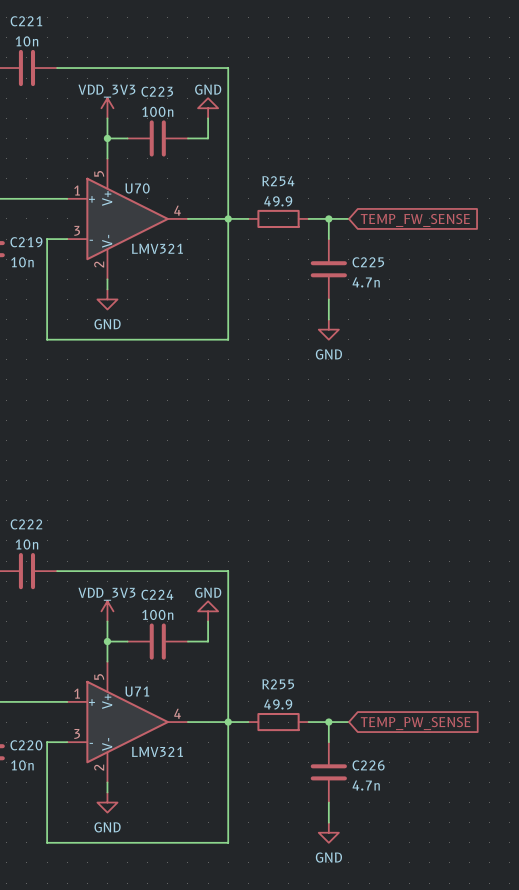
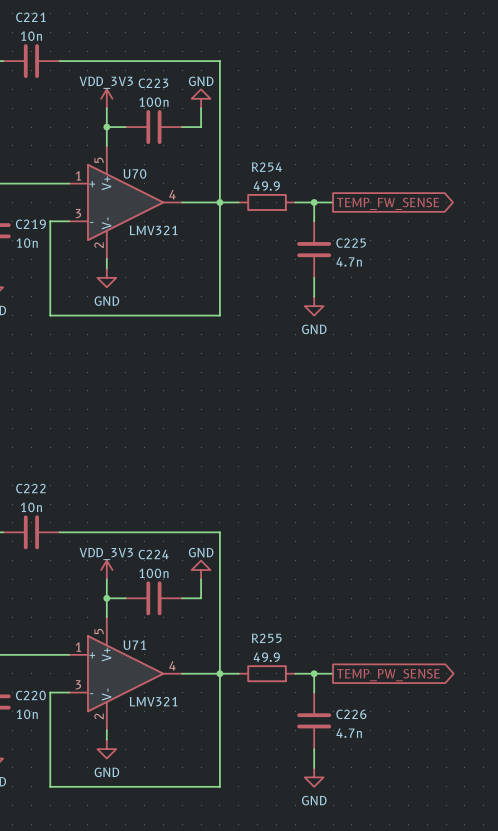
global label shape: input (415, 220) -> output (388, 203)
global label shape: input (415, 723) -> output (388, 675)

